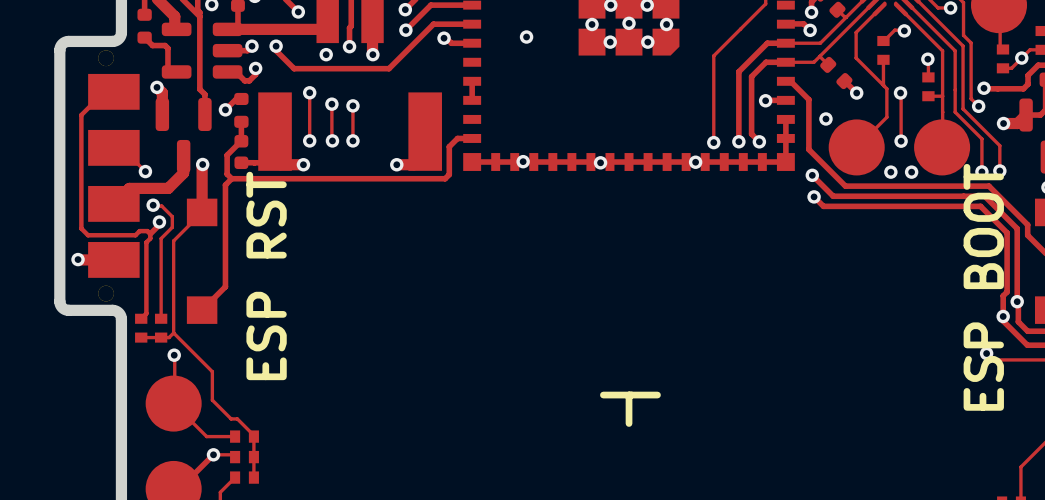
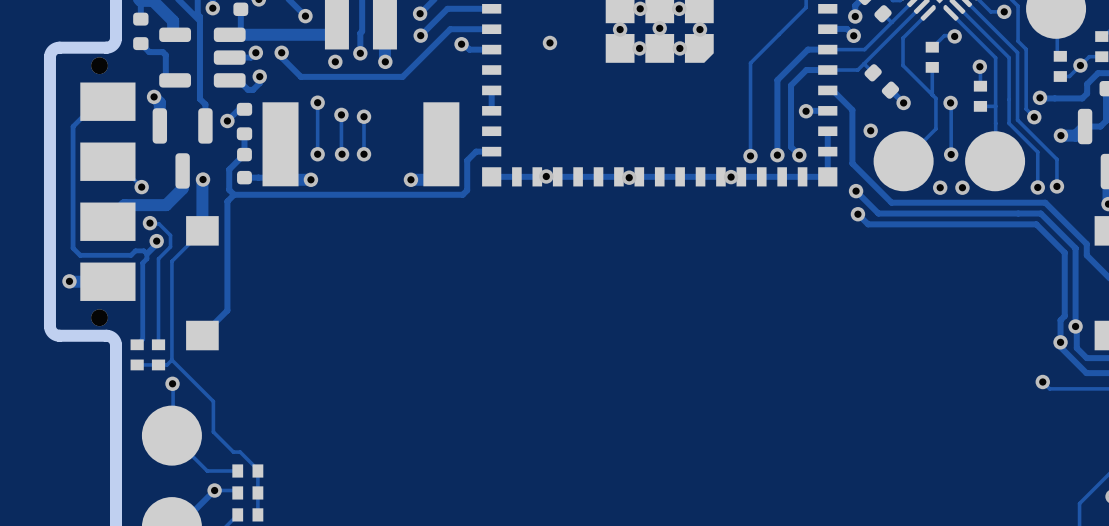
text: ESP RST (266, 275) -> none
text: ESP BOOT (983, 287) -> none
line: (603, 395) (657, 395) -> none
line: (629, 395) (629, 423) -> none

